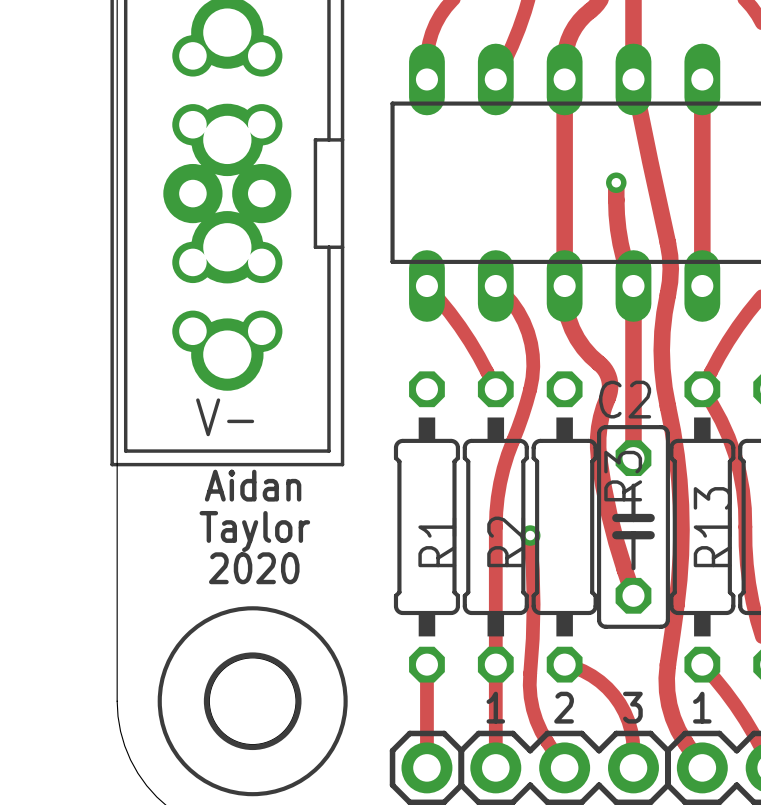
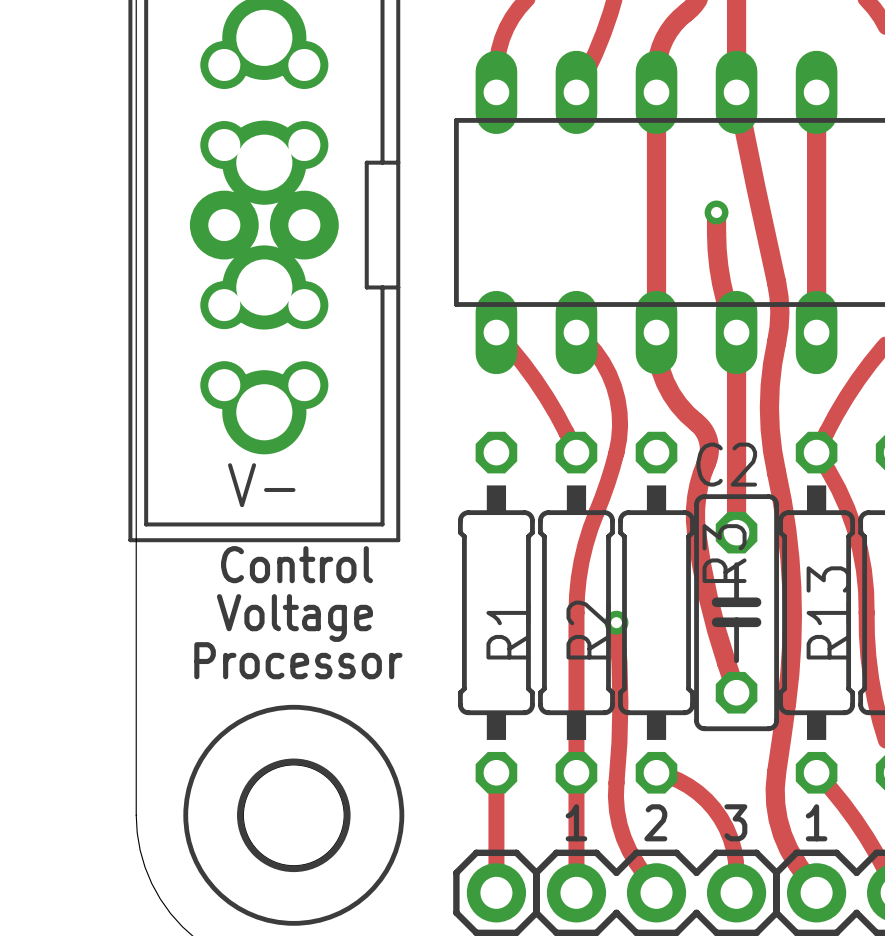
text: Aidan (253, 485) -> Control (297, 564)
text: Taylor (254, 531) -> Voltage (294, 618)
text: 2020 (254, 568) -> Processor (298, 660)

